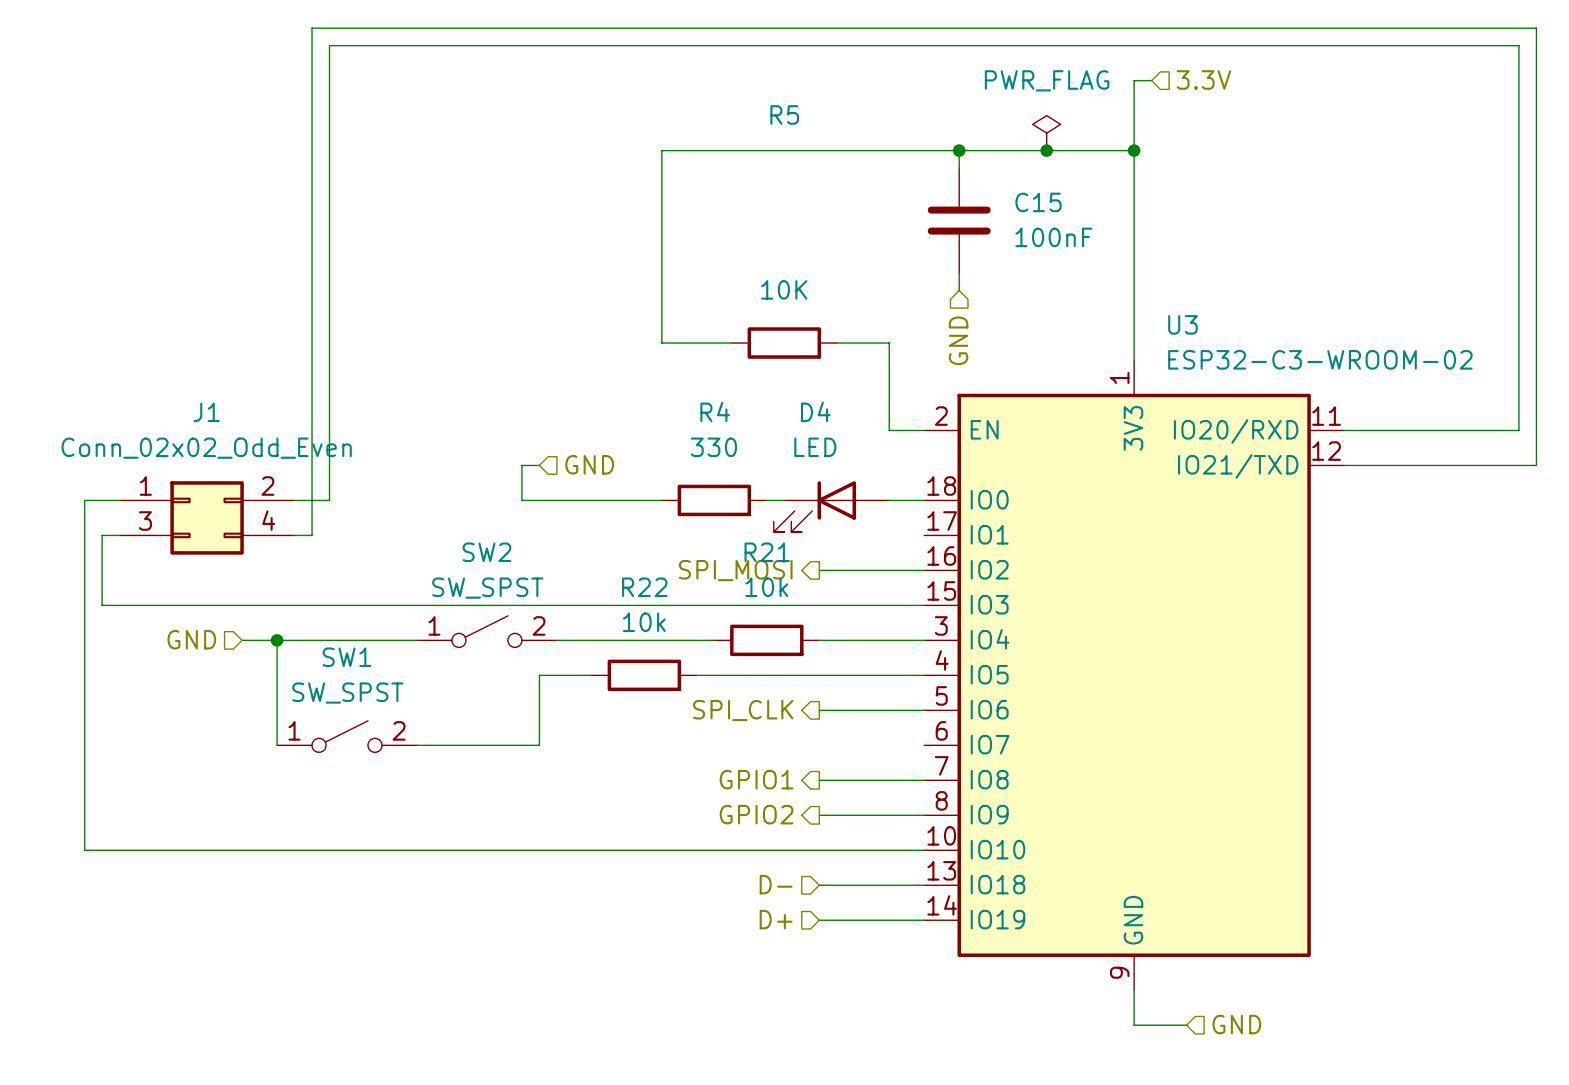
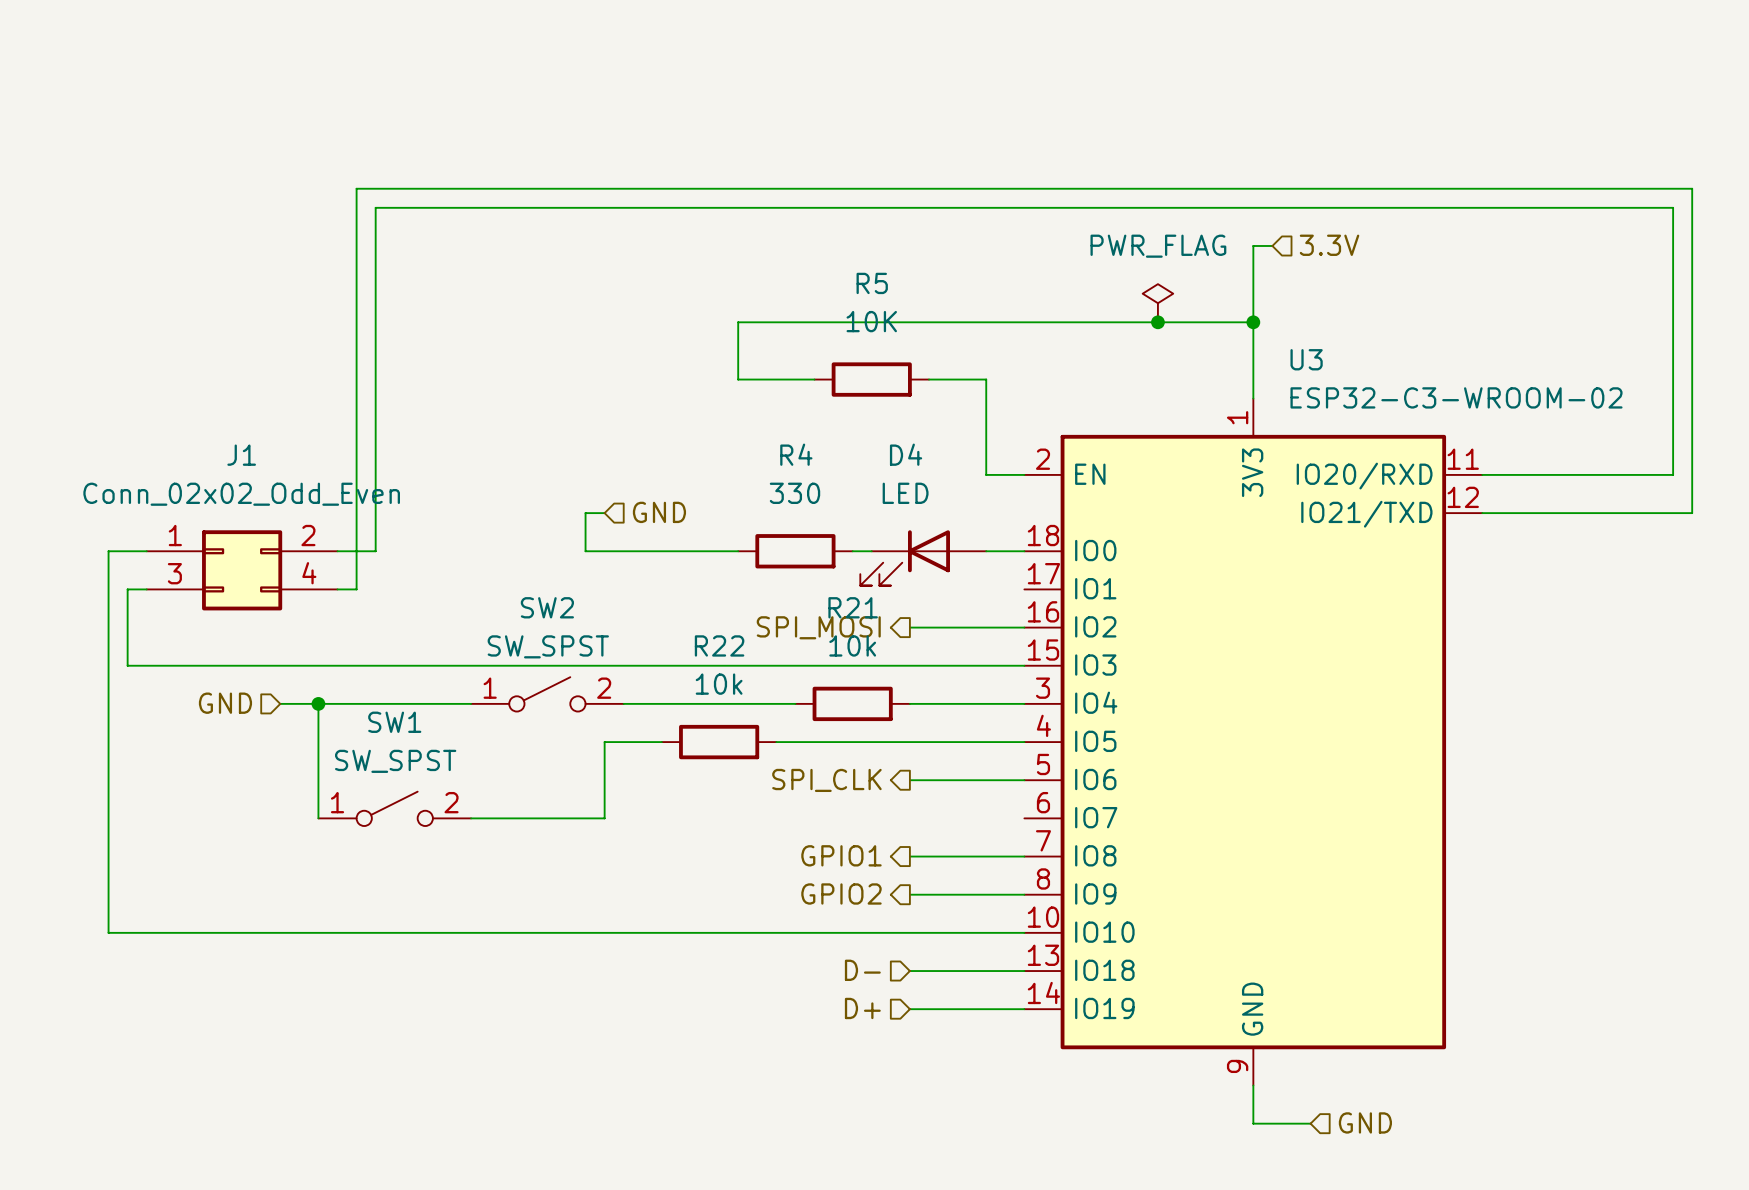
hierarchical label position: 3.3V (1203, 79) -> 3.3V (1329, 245)
wire: (1151, 80) (1134, 80) (1134, 220) -> (1272, 245) (1253, 245)
R5 name position: R5 (784, 114) -> R5 (872, 283)
power symbol position: PWR_FLAG (1046, 133) -> PWR_FLAG (1157, 303)
wire: (959, 150) (959, 168) -> none
junction: (959, 150) -> none
junction: (1046, 150) -> none
wire: (1134, 150) (661, 150) (661, 290) -> (1253, 322) (738, 322)
junction: (1134, 150) -> none
wire: (312, 168) (312, 28) (1536, 28) (1536, 168) -> (356, 188) (1692, 188)
wire: (329, 185) (329, 45) (1518, 45) (1518, 185) -> (375, 207) (1673, 207)
C15: 100nF (959, 220) -> none
wire: (959, 273) (959, 290) -> none
junction: none -> (1157, 322)
junction: none -> (1253, 322)
hierarchical label: GND (958, 340) -> none

